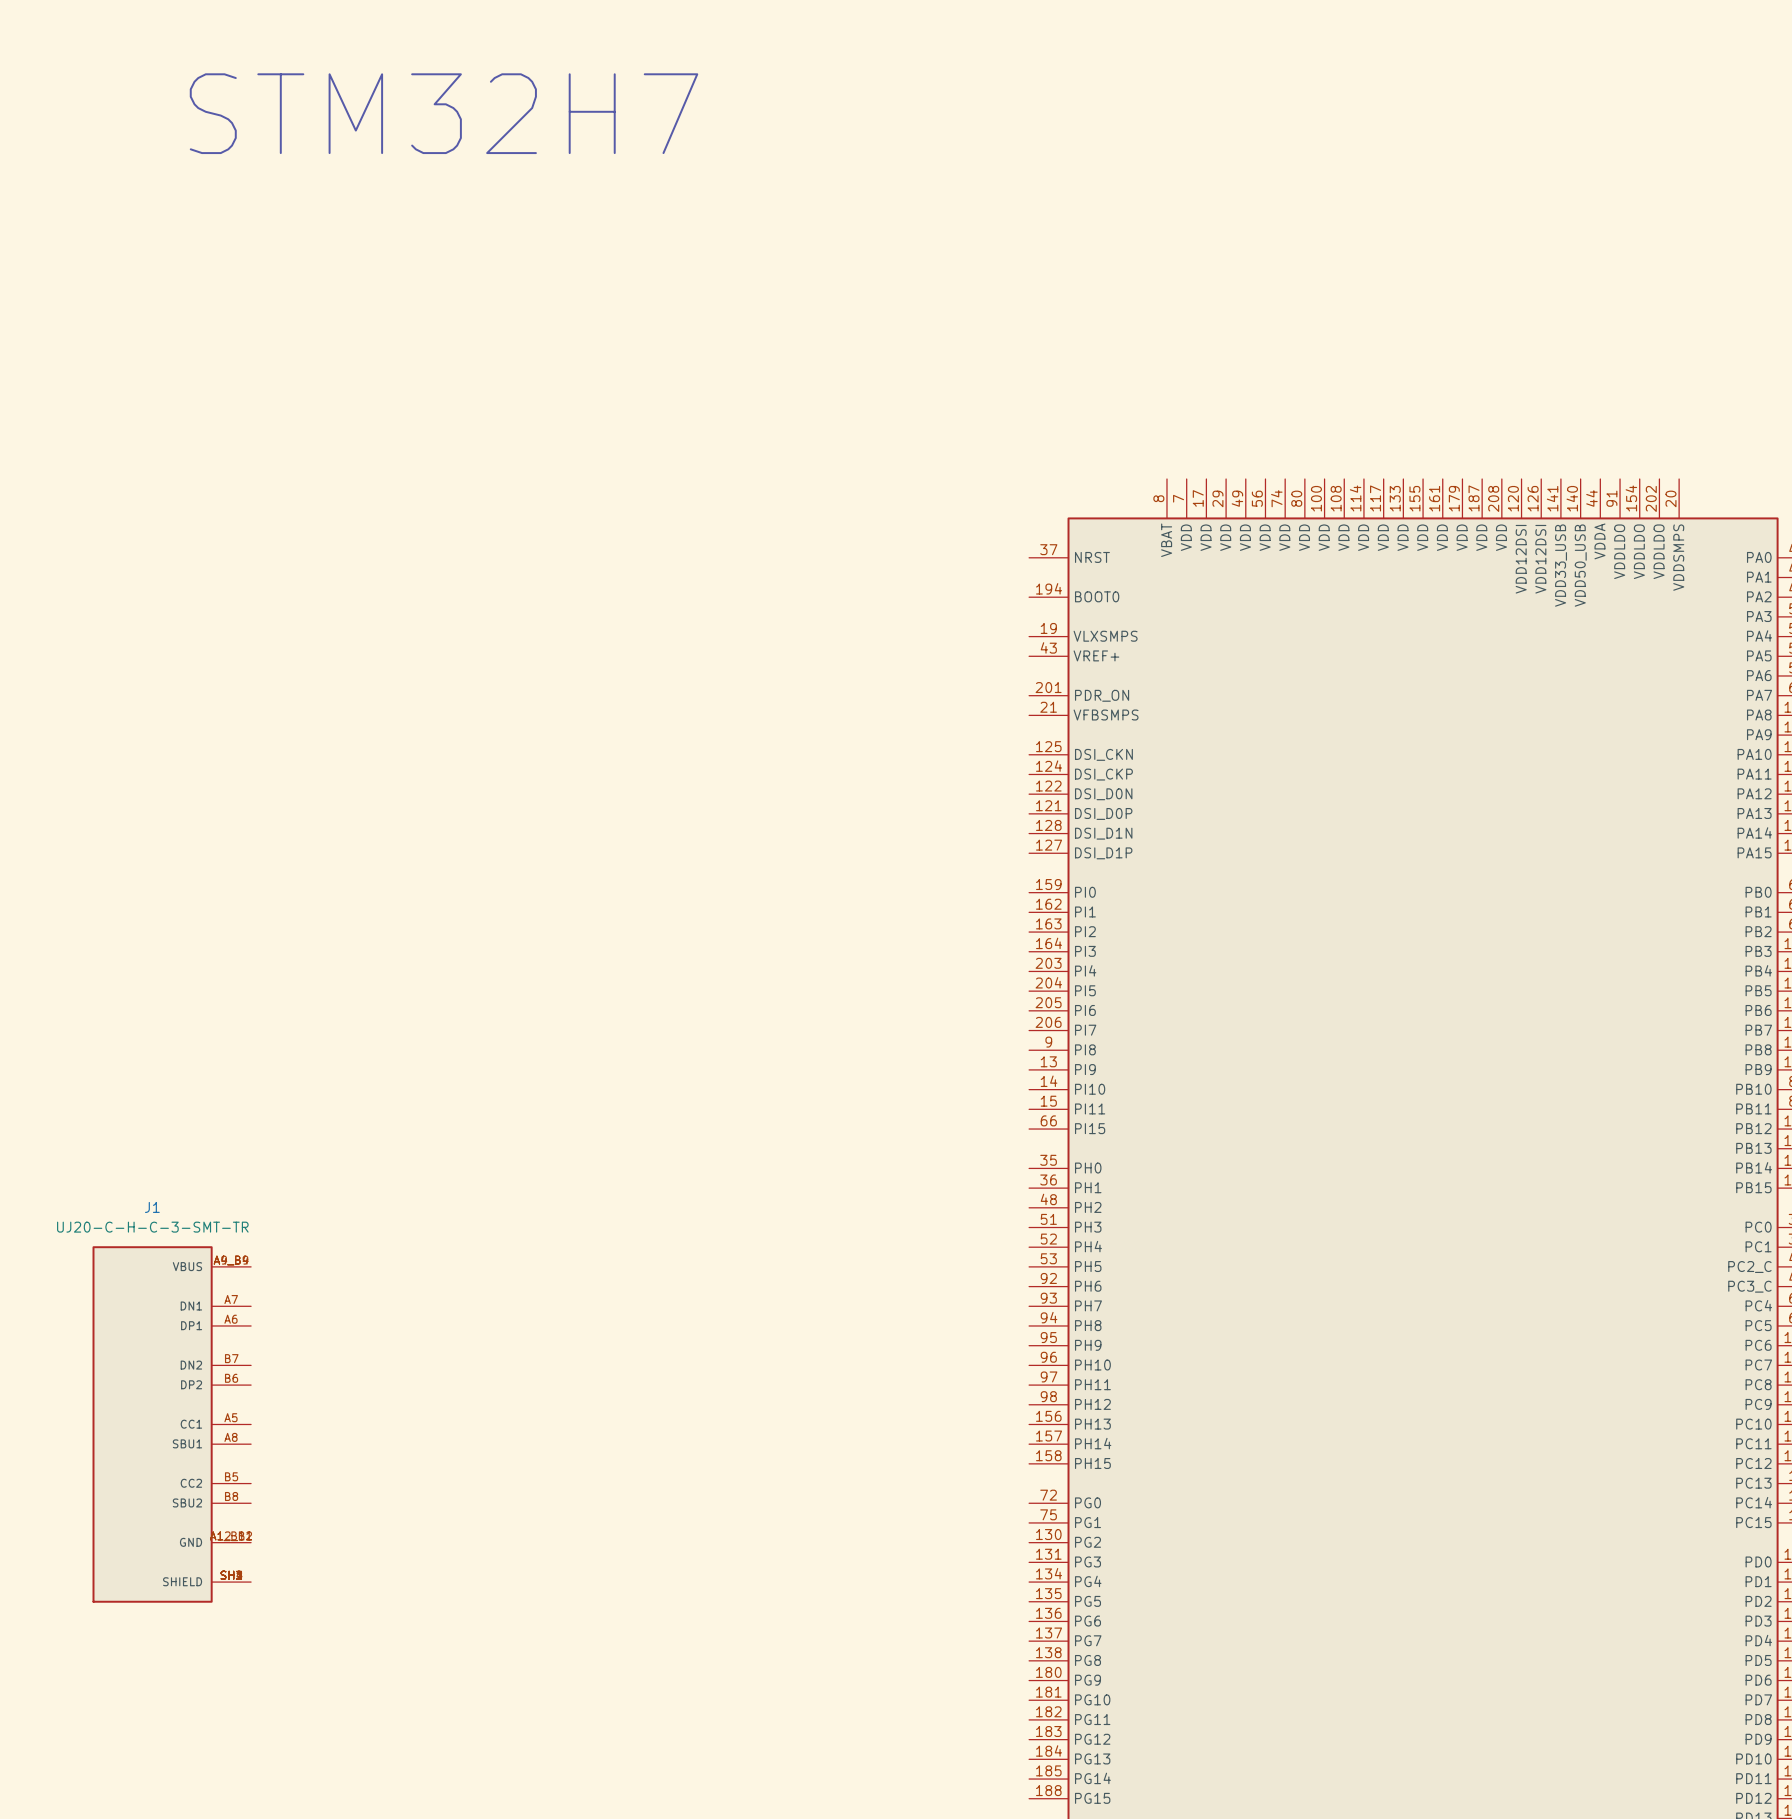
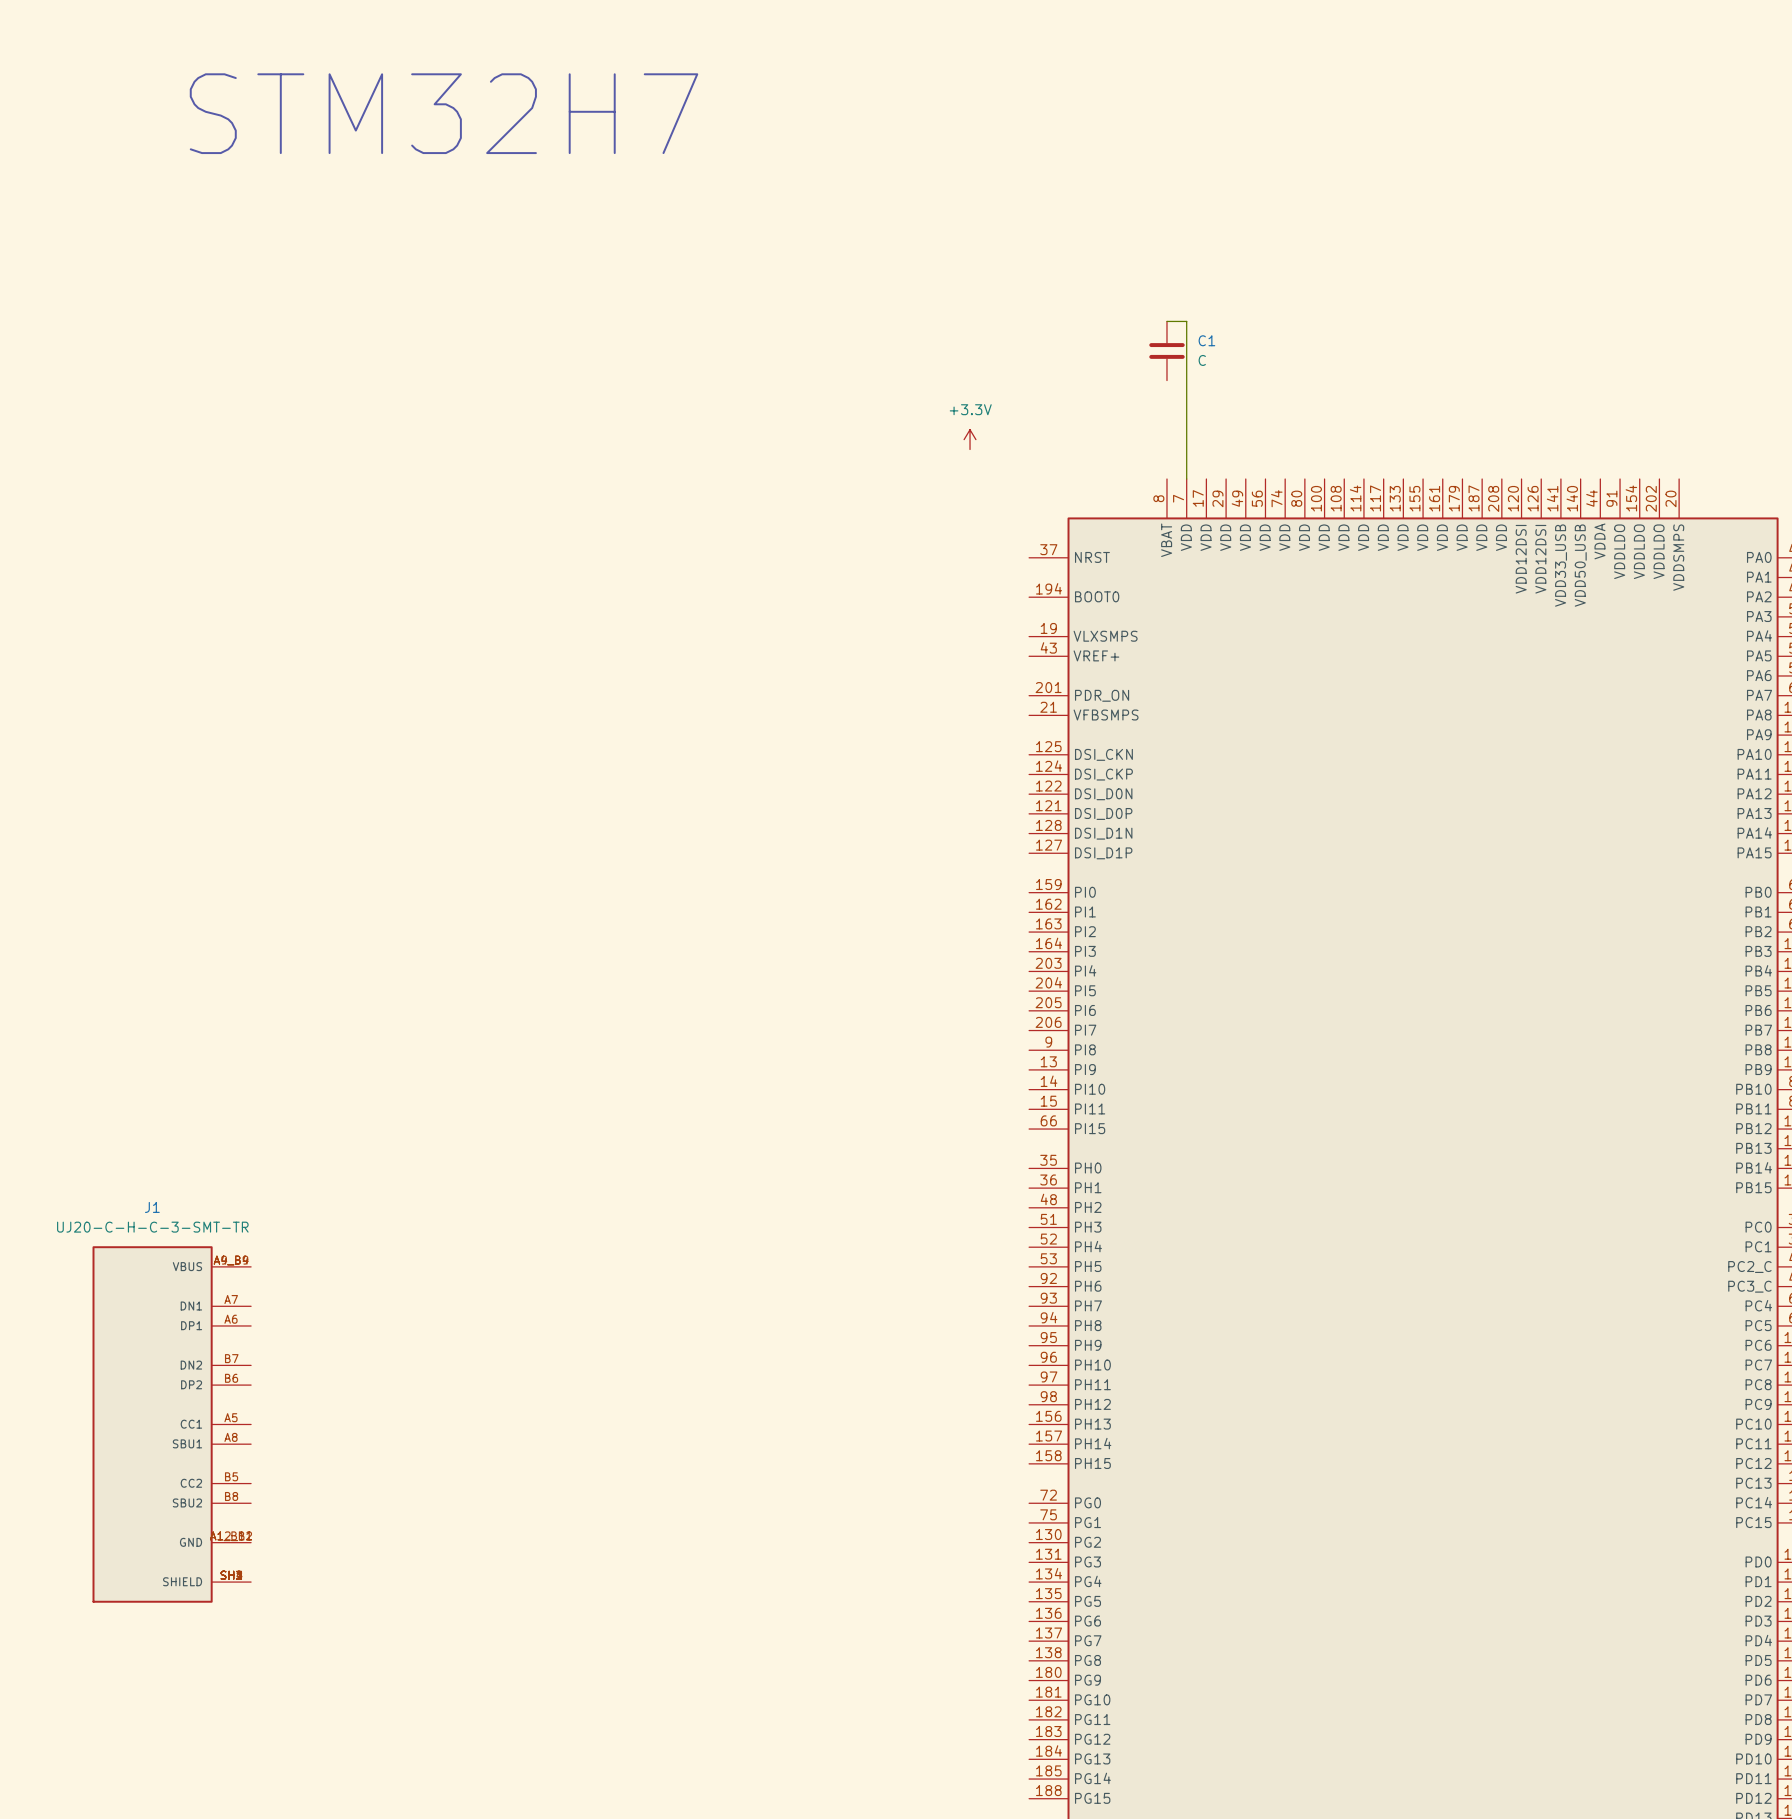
wire: none -> (1166, 321) (1186, 321) (1186, 479)
C1: none -> C (1166, 350)
power symbol: none -> +3.3V (970, 439)

